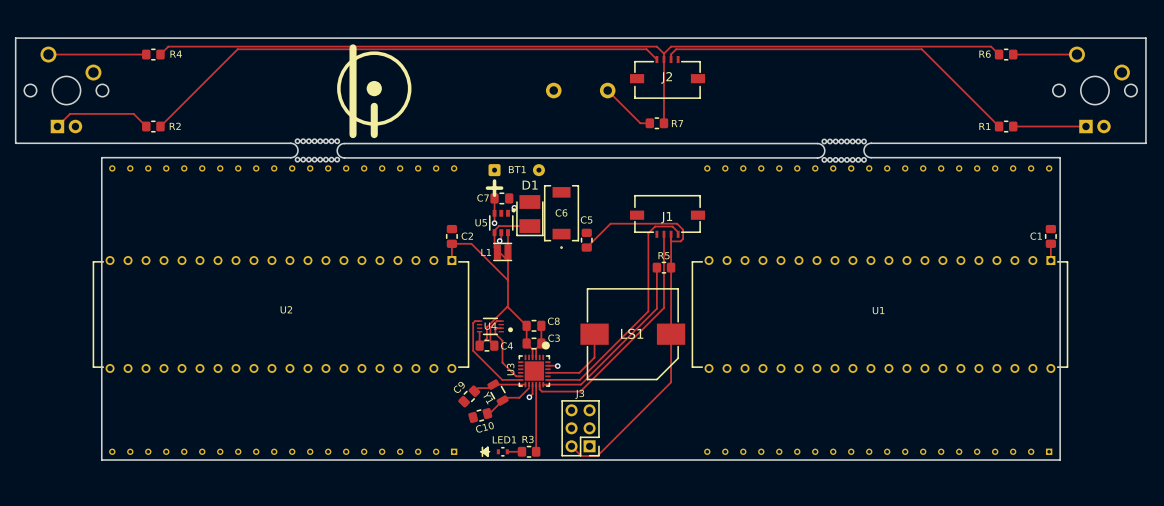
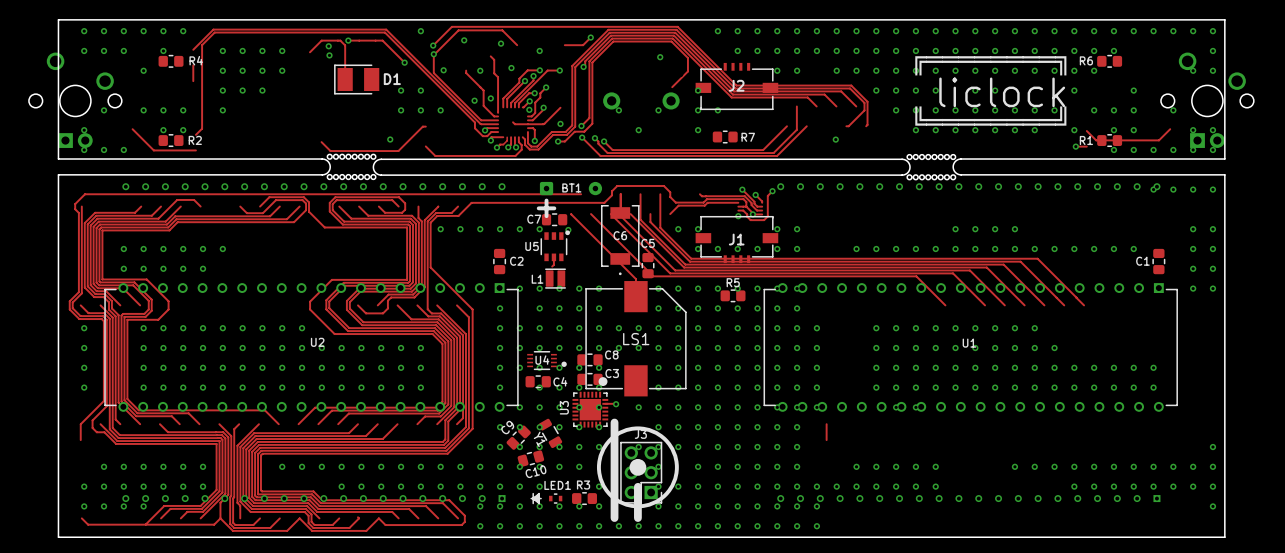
board edge: none -> (1224, 19) (1224, 159)
via: none -> (84, 31)
via: none -> (104, 31)
via: none -> (123, 31)
via: none -> (143, 31)
via: none -> (163, 31)
via: none -> (183, 31)
via: none -> (420, 31)
via: none -> (717, 31)
via: none -> (737, 31)
via: none -> (757, 31)
via: none -> (777, 31)
via: none -> (797, 31)
via: none -> (816, 31)
via: none -> (836, 31)
via: none -> (856, 31)
via: none -> (876, 31)
via: none -> (896, 31)
via: none -> (915, 31)
via: none -> (935, 31)
via: none -> (955, 31)
via: none -> (975, 31)
via: none -> (995, 31)
via: none -> (1014, 31)
via: none -> (1034, 31)
via: none -> (1054, 31)
via: none -> (1074, 31)
via: none -> (1094, 31)
via: none -> (1113, 31)
via: none -> (1133, 31)
via: none -> (1153, 31)
via: none -> (1173, 31)
via: none -> (1193, 31)
via: none -> (1212, 31)
track: none -> (590, 37) (583, 45) (564, 45)
via: none -> (590, 37)
track: none -> (348, 40) (382, 40) (404, 62)
via: none -> (348, 40)
via: none -> (464, 40)
via: none -> (501, 43)
track: none -> (517, 45) (502, 30) (458, 30) (433, 54) (433, 73) (481, 120) (498, 120)
via: none -> (328, 46)
track: none -> (433, 45) (451, 26) (677, 26) (736, 85) (851, 85) (867, 101) (866, 126)
via: none -> (433, 45)
track: none -> (193, 49) (213, 29) (386, 29) (480, 123) (498, 124)
via: none -> (84, 50)
via: none -> (104, 50)
via: none -> (123, 50)
via: none -> (163, 50)
via: none -> (222, 50)
via: none -> (242, 50)
via: none -> (262, 50)
via: none -> (282, 50)
via: none -> (539, 50)
via: none -> (737, 50)
via: none -> (757, 50)
via: none -> (777, 50)
via: none -> (797, 50)
via: none -> (816, 50)
via: none -> (836, 50)
via: none -> (856, 50)
via: none -> (876, 50)
via: none -> (896, 50)
via: none -> (915, 50)
via: none -> (935, 50)
via: none -> (955, 50)
via: none -> (975, 50)
via: none -> (995, 50)
via: none -> (1014, 50)
via: none -> (1034, 50)
via: none -> (1054, 50)
via: none -> (1074, 50)
via: none -> (1094, 50)
via: none -> (1113, 50)
via: none -> (1212, 50)
track: none -> (309, 52) (321, 40) (340, 40) (345, 45) (345, 79)
line: (353, 47) (353, 134) -> none
via: none -> (433, 54)
via: none -> (329, 55)
track: none -> (490, 56) (494, 59) (494, 73) (498, 77) (498, 112)
via: none -> (660, 57)
drawing: [337, 51, 412, 126] -> none
track: (663, 53) (663, 123) -> none
track: (663, 53) (671, 46) (991, 46) (999, 54) -> none
track: (663, 53) (656, 46) (168, 46) (160, 54) -> none
track: (48, 54) (146, 54) -> none
track: (1013, 54) (1076, 54) -> none
via: none -> (404, 62)
track: none -> (193, 65) (193, 81)
text: none -> ╔════════╗ (990, 65)
track: none -> (583, 66) (585, 61) (610, 35) (674, 35) (732, 94) (824, 94) (836, 106)
via: none -> (583, 66)
track: (656, 59) (646, 49) (237, 49) (160, 126) -> none
track: (671, 59) (671, 54) (676, 49) (921, 49) (999, 126) -> none
via: none -> (511, 68)
via: none -> (443, 70)
track: none -> (466, 70) (466, 73) (483, 90) (483, 105) (494, 116) (498, 116)
track: none -> (539, 70) (527, 70) (519, 78) (519, 82) (503, 98) (503, 107)
via: none -> (539, 70)
track: none -> (559, 70) (547, 70) (514, 103) (514, 107)
via: none -> (559, 70)
via: none -> (143, 70)
via: none -> (222, 70)
via: none -> (242, 70)
via: none -> (262, 70)
via: none -> (282, 70)
via: none -> (480, 70)
via: none -> (777, 70)
via: none -> (797, 70)
via: none -> (836, 70)
via: none -> (856, 70)
via: none -> (876, 70)
via: none -> (896, 70)
via: none -> (915, 70)
via: none -> (935, 70)
via: none -> (955, 70)
via: none -> (975, 70)
via: none -> (995, 70)
via: none -> (1014, 70)
via: none -> (1034, 70)
via: none -> (1054, 70)
via: none -> (1074, 70)
via: none -> (1094, 70)
via: none -> (1193, 70)
via: none -> (1212, 70)
track: none -> (533, 76) (533, 80) (511, 102) (511, 107)
via: none -> (533, 76)
track: none -> (525, 81) (507, 98) (507, 107)
via: none -> (525, 81)
track: none -> (546, 87) (535, 102) (535, 113) (531, 116) (527, 116)
via: none -> (546, 87)
track: none -> (672, 87) (687, 71) (687, 57) (671, 41) (613, 41) (592, 62) (592, 123) (584, 131) (574, 131) (564, 141) (558, 141)
via: none -> (222, 90)
via: none -> (242, 90)
via: none -> (262, 90)
via: none -> (401, 90)
via: none -> (420, 90)
via: none -> (698, 90)
via: none -> (876, 90)
via: none -> (896, 90)
via: none -> (915, 90)
via: none -> (935, 90)
via: none -> (975, 90)
via: none -> (995, 90)
via: none -> (1074, 90)
via: none -> (1133, 90)
text: none -> liclock (1002, 92)
track: none -> (534, 93) (529, 93) (518, 103) (518, 107)
via: none -> (534, 93)
via: none -> (490, 98)
via: none -> (474, 100)
track: none -> (529, 101) (522, 107)
via: none -> (529, 101)
track: (607, 90) (640, 123) (649, 123) -> none
track: none -> (796, 106) (796, 129) (773, 153) (607, 153) (594, 138)
track: none -> (816, 106) (807, 97) (731, 97) (672, 38) (612, 38) (589, 61) (589, 118) (581, 126)
track: none -> (856, 106) (841, 91) (733, 91) (675, 32) (609, 32) (575, 67) (575, 126) (566, 134) (553, 134) (538, 149) (529, 149) (525, 144) (525, 139) (522, 137)
track: none -> (543, 107) (532, 120) (527, 120)
via: none -> (543, 107)
track: none -> (560, 107) (543, 124) (514, 124) (513, 122)
via: none -> (529, 109)
via: none -> (104, 110)
via: none -> (143, 110)
via: none -> (163, 110)
via: none -> (183, 110)
via: none -> (222, 110)
via: none -> (401, 110)
via: none -> (420, 110)
via: none -> (440, 110)
via: none -> (618, 110)
via: none -> (658, 110)
via: none -> (698, 110)
via: none -> (717, 110)
via: none -> (896, 110)
via: none -> (915, 110)
via: none -> (935, 110)
via: none -> (955, 110)
via: none -> (975, 110)
via: none -> (995, 110)
via: none -> (1014, 110)
via: none -> (1034, 110)
via: none -> (1054, 110)
via: none -> (1094, 110)
via: none -> (1113, 110)
via: none -> (1133, 110)
via: none -> (1173, 110)
text: none -> ╚════════╝ (990, 116)
line: (374, 106) (374, 134) -> none
via: none -> (560, 123)
track: none -> (425, 126) (422, 126) (398, 151) (330, 151) (321, 142)
via: none -> (581, 126)
track: none -> (786, 126) (763, 150) (612, 150) (604, 141)
track: none -> (806, 126) (777, 155) (600, 155) (582, 137)
track: none -> (846, 126) (864, 110) (864, 102) (850, 88) (735, 88) (676, 29) (608, 29) (572, 65) (572, 125) (565, 131) (551, 131) (537, 146) (531, 146) (527, 143) (527, 132)
track: none -> (498, 128) (487, 128) (485, 130)
track: none -> (527, 128) (534, 129) (534, 140)
track: none -> (132, 129) (153, 150) (195, 150)
track: none -> (1170, 129) (1159, 140) (1096, 140) (1086, 131)
via: none -> (84, 130)
via: none -> (163, 130)
via: none -> (183, 130)
via: none -> (485, 130)
via: none -> (638, 130)
via: none -> (698, 130)
via: none -> (915, 130)
via: none -> (935, 130)
via: none -> (955, 130)
via: none -> (975, 130)
via: none -> (995, 130)
via: none -> (1014, 130)
via: none -> (1034, 130)
via: none -> (1074, 130)
via: none -> (1113, 130)
via: none -> (1133, 130)
via: none -> (1193, 130)
via: none -> (1212, 130)
track: none -> (498, 132) (491, 132) (487, 136) (482, 136) (474, 128) (474, 122) (384, 32) (214, 32) (202, 45) (202, 128) (195, 134)
track: none -> (503, 137) (491, 137) (490, 140)
track: none -> (507, 137) (507, 140) (496, 147)
track: none -> (511, 137) (511, 144) (508, 147)
track: none -> (514, 137) (516, 147)
track: none -> (518, 137) (521, 149) (515, 155) (435, 155) (425, 146)
via: none -> (582, 137)
via: none -> (594, 138)
via: none -> (390, 139)
via: none -> (835, 139)
track: (57, 126) (70, 113) (133, 113) (146, 126) -> none
via: none -> (490, 140)
via: none -> (534, 140)
track: (1013, 126) (1085, 126) -> none
via: none -> (558, 141)
via: none -> (604, 141)
via: none -> (496, 147)
via: none -> (508, 147)
via: none -> (516, 147)
track: none -> (1075, 146) (1086, 146)
via: none -> (1075, 146)
via: none -> (84, 149)
via: none -> (104, 149)
via: none -> (123, 149)
via: none -> (1113, 149)
via: none -> (1133, 149)
via: none -> (1153, 149)
via: none -> (1173, 149)
via: none -> (1193, 149)
via: none -> (1212, 149)
board edge: (51, 143) (15, 143) (15, 38) (1145, 38) (1145, 143) (1110, 143) -> (58, 159) (58, 19) (1224, 19)
board edge: (290, 157) (101, 157) (101, 460) (1060, 460) (1060, 157) -> (322, 174) (58, 174) (58, 537) (1224, 537) (1224, 174) (1169, 174)
track: none -> (742, 189) (757, 206) (762, 206)
via: none -> (742, 189)
via: none -> (1153, 189)
via: none -> (1173, 189)
via: none -> (1193, 189)
via: none -> (1212, 189)
track: none -> (772, 191) (767, 195) (767, 216) (764, 220) (750, 220) (743, 210) (738, 210)
via: none -> (772, 191)
track: none -> (620, 193) (620, 215) (675, 270) (969, 270) (1004, 305)
track: none -> (581, 194) (85, 194) (75, 204) (75, 209) (78, 212) (78, 292) (69, 301) (69, 309) (79, 319) (101, 319) (103, 321) (103, 401) (80, 424) (80, 440)
track: none -> (640, 194) (640, 219) (685, 264) (1003, 264) (1044, 305)
track: none -> (660, 194) (660, 227) (691, 258) (1037, 258) (1084, 305)
track: none -> (699, 194) (705, 196)
track: none -> (755, 194) (762, 202)
via: none -> (755, 194)
track: none -> (705, 196) (744, 196) (757, 210) (762, 210)
track: none -> (738, 202) (678, 205) (670, 214)
track: none -> (81, 206) (81, 293) (72, 302) (72, 308) (80, 316) (102, 316) (106, 319) (106, 406) (92, 420) (92, 427) (96, 432) (104, 432) (116, 443) (216, 443) (216, 489) (200, 505) (164, 505) (145, 524)
track: none -> (141, 206) (134, 212) (95, 212) (84, 223) (84, 287) (94, 297) (103, 297) (108, 302) (108, 309) (115, 316) (115, 419) (120, 424)
track: none -> (161, 206) (151, 215) (96, 215) (87, 224) (87, 286) (95, 294) (104, 294) (111, 301) (111, 308) (118, 315) (118, 402) (140, 424)
track: none -> (180, 206) (165, 221) (98, 221) (93, 226) (93, 283) (97, 288) (123, 288) (140, 305)
track: none -> (200, 206) (194, 199) (177, 199) (158, 218) (97, 218) (90, 225) (90, 285) (96, 291) (106, 291) (120, 305)
track: none -> (240, 206) (246, 213) (262, 213) (275, 200) (302, 200) (306, 203) (306, 210) (294, 222) (177, 222) (169, 230) (102, 230) (102, 279) (146, 279) (168, 301) (168, 309) (158, 319) (127, 319) (127, 398) (138, 410) (264, 410) (278, 424)
track: none -> (260, 206) (269, 197) (303, 197) (309, 202) (309, 211) (324, 227) (407, 227) (407, 279) (331, 279) (310, 301) (310, 309) (334, 334) (432, 334) (442, 343) (442, 401) (436, 407) (315, 407) (298, 424)
track: none -> (279, 206) (270, 216) (175, 216) (166, 224) (99, 224) (96, 228) (96, 282) (99, 285) (133, 285) (148, 300) (148, 309) (144, 313) (123, 313) (121, 315) (121, 401) (136, 416) (171, 416) (179, 424)
track: none -> (299, 206) (286, 219) (176, 219) (168, 227) (101, 227) (99, 229) (99, 281) (134, 282) (151, 299) (151, 310) (145, 316) (124, 316) (124, 400) (137, 413) (188, 413) (199, 424)
track: none -> (339, 206) (351, 218) (410, 218) (415, 223) (415, 283) (410, 288) (359, 288) (346, 300) (346, 309) (362, 325) (436, 325) (451, 340) (451, 405) (440, 416) (425, 416) (417, 424)
track: none -> (359, 206) (368, 215) (411, 215) (418, 222) (418, 284) (411, 291) (360, 291) (349, 302) (349, 308) (363, 322) (437, 322) (454, 339) (454, 407) (437, 424)
track: none -> (378, 206) (385, 212) (402, 212) (405, 209) (405, 203) (398, 197) (335, 197) (329, 202) (329, 211) (342, 224) (408, 224) (410, 226) (410, 281) (408, 282) (343, 282) (326, 300) (326, 309) (348, 331) (433, 331) (445, 342) (445, 403) (437, 410) (331, 410) (318, 424)
track: none -> (398, 206) (392, 200) (336, 200) (332, 204) (332, 210) (344, 221) (409, 221) (412, 225) (412, 282) (409, 285) (345, 285) (329, 301) (329, 308) (349, 328) (435, 328) (448, 341) (448, 404) (439, 413) (348, 413) (338, 424)
track: none -> (418, 206) (418, 218) (421, 221) (421, 285) (413, 294) (388, 294) (377, 305)
track: none -> (438, 206) (424, 220) (424, 287) (414, 297) (391, 297) (387, 300) (387, 308) (383, 313) (365, 313) (357, 305)
track: none -> (458, 206) (451, 212) (436, 212) (427, 221) (427, 309) (431, 313) (441, 313) (463, 335) (463, 418) (456, 424)
track: none -> (738, 206) (746, 206)
track: none -> (746, 206) (746, 201) (743, 199) (707, 199) (703, 202) (675, 202) (663, 185) (617, 185) (604, 202) (471, 202) (458, 215) (437, 215) (430, 222) (430, 267) (472, 309) (472, 428) (447, 453) (262, 453) (260, 455) (260, 490) (313, 491) (322, 500) (449, 500) (464, 515) (464, 521) (461, 525) (385, 525) (378, 518) (366, 530) (312, 530) (299, 518) (287, 530) (232, 530) (220, 518)
track: none -> (746, 206) (752, 214) (762, 214)
track: none -> (571, 214) (635, 279) (635, 296)
track: none -> (591, 214) (653, 276) (916, 276) (945, 305)
track: none -> (610, 214) (670, 273) (953, 273) (985, 305)
track: none -> (630, 214) (684, 267) (986, 267) (1024, 305)
track: none -> (650, 214) (650, 222) (690, 261) (1020, 261) (1056, 297)
via: none -> (752, 214)
via: none -> (738, 216)
track: (494, 198) (494, 223) -> none
via: none -> (440, 229)
via: none -> (460, 229)
via: none -> (480, 229)
via: none -> (500, 229)
via: none -> (519, 229)
via: none -> (539, 229)
via: none -> (678, 229)
via: none -> (698, 229)
via: none -> (777, 229)
via: none -> (797, 229)
via: none -> (955, 229)
via: none -> (975, 229)
via: none -> (995, 229)
via: none -> (1014, 229)
via: none -> (1193, 229)
via: none -> (1212, 229)
D1 rotation: 0° (529, 215) -> 90° clockwise (356, 79)
D1 position: (529, 215) -> (356, 79)
via: (494, 223) -> none
via: none -> (123, 248)
via: none -> (143, 248)
via: none -> (163, 248)
via: none -> (183, 248)
via: none -> (203, 248)
via: none -> (222, 248)
via: none -> (698, 248)
via: none -> (717, 248)
via: none -> (737, 248)
via: none -> (757, 248)
via: none -> (777, 248)
via: none -> (797, 248)
via: none -> (856, 248)
via: none -> (876, 248)
via: none -> (896, 248)
via: none -> (915, 248)
via: none -> (935, 248)
via: none -> (955, 248)
via: none -> (975, 248)
via: none -> (995, 248)
via: none -> (1014, 248)
via: none -> (1034, 248)
via: none -> (1054, 248)
via: none -> (1074, 248)
via: none -> (1094, 248)
via: none -> (1113, 248)
via: none -> (1133, 248)
via: none -> (1193, 248)
via: none -> (1212, 248)
track: (529, 226) (498, 226) (494, 230) (494, 247) (505, 258) -> none
track: (508, 232) (508, 307) -> none
track: (663, 234) (663, 307) (580, 391) (542, 391) (539, 384) -> none
track: (671, 234) (671, 382) (597, 456) (581, 456) (571, 446) -> none
track: (678, 234) (672, 226) (655, 226) (648, 233) (648, 311) (579, 379) (547, 379) -> none
via: (499, 241) -> none
track: (671, 241) (680, 241) (683, 238) (683, 229) (677, 223) (610, 223) (586, 247) -> none
via: none -> (123, 268)
via: none -> (143, 268)
via: none -> (163, 268)
via: none -> (183, 268)
via: none -> (203, 268)
track: (1050, 243) (1050, 260) -> none
via: none -> (1193, 268)
via: none -> (1212, 268)
track: (451, 260) (451, 243) (471, 243) (508, 280) -> none
via: none -> (519, 288)
via: none -> (539, 288)
via: none -> (559, 288)
via: none -> (579, 288)
via: none -> (599, 288)
via: none -> (658, 288)
via: none -> (678, 288)
via: none -> (698, 288)
via: none -> (717, 288)
via: none -> (737, 288)
via: none -> (757, 288)
via: none -> (777, 288)
via: none -> (797, 288)
via: none -> (1193, 288)
via: none -> (1212, 288)
track: (656, 267) (656, 308) (581, 384) (543, 384) -> none
track: none -> (1056, 297) (1064, 305)
track: none -> (80, 305) (88, 313) (104, 313) (109, 318) (109, 429) (118, 438) (218, 438)
track: none -> (100, 305) (112, 317) (112, 428) (119, 435) (217, 435)
track: none -> (397, 305) (411, 319) (438, 319) (457, 337) (457, 408) (445, 420) (445, 439) (442, 441) (257, 441) (249, 450) (249, 498) (254, 503) (308, 503) (317, 512) (392, 512) (398, 518)
track: none -> (417, 305) (428, 316) (439, 316) (460, 336) (460, 409) (448, 421) (448, 440) (444, 444) (259, 444) (252, 451) (252, 496) (255, 500) (309, 500) (318, 509) (409, 509) (418, 518)
track: none -> (437, 305) (465, 334) (465, 427) (445, 447) (260, 447) (255, 453) (255, 495) (256, 497) (310, 497) (319, 506) (426, 506) (438, 518)
track: none -> (456, 305) (468, 317) (468, 428) (446, 450) (261, 450) (258, 454) (258, 494) (312, 494) (320, 503) (442, 503) (458, 518)
via: none -> (500, 308)
via: none -> (539, 308)
via: none -> (559, 308)
via: none -> (579, 308)
via: none -> (599, 308)
via: none -> (658, 308)
via: none -> (678, 308)
via: none -> (698, 308)
via: none -> (717, 308)
via: none -> (737, 308)
via: none -> (757, 308)
via: none -> (777, 308)
via: none -> (797, 308)
via: none -> (84, 328)
via: none -> (143, 328)
via: none -> (163, 328)
via: none -> (183, 328)
via: none -> (203, 328)
via: none -> (222, 328)
via: none -> (242, 328)
via: none -> (262, 328)
via: none -> (282, 328)
via: none -> (302, 328)
via: none -> (500, 328)
via: none -> (519, 328)
via: none -> (539, 328)
via: none -> (559, 328)
via: none -> (579, 328)
via: none -> (599, 328)
via: none -> (618, 328)
via: none -> (638, 328)
via: none -> (658, 328)
via: none -> (678, 328)
via: none -> (698, 328)
via: none -> (717, 328)
via: none -> (737, 328)
via: none -> (757, 328)
via: none -> (777, 328)
via: none -> (797, 328)
via: none -> (816, 328)
via: none -> (876, 328)
via: none -> (896, 328)
via: none -> (915, 328)
via: none -> (935, 328)
via: none -> (955, 328)
via: none -> (975, 328)
via: none -> (995, 328)
via: none -> (1014, 328)
via: none -> (1034, 328)
via: none -> (84, 348)
via: none -> (143, 348)
via: none -> (163, 348)
via: none -> (183, 348)
via: none -> (203, 348)
via: none -> (222, 348)
via: none -> (242, 348)
via: none -> (262, 348)
via: none -> (282, 348)
via: none -> (302, 348)
via: none -> (321, 348)
via: none -> (341, 348)
via: none -> (361, 348)
via: none -> (381, 348)
via: none -> (401, 348)
via: none -> (420, 348)
via: none -> (500, 348)
via: none -> (519, 348)
via: none -> (539, 348)
via: none -> (559, 348)
via: none -> (579, 348)
via: none -> (599, 348)
via: none -> (618, 348)
via: none -> (638, 348)
via: none -> (658, 348)
via: none -> (678, 348)
via: none -> (698, 348)
via: none -> (717, 348)
via: none -> (737, 348)
via: none -> (757, 348)
via: none -> (777, 348)
via: none -> (797, 348)
via: none -> (816, 348)
via: none -> (876, 348)
via: none -> (896, 348)
via: none -> (915, 348)
via: none -> (935, 348)
via: none -> (955, 348)
via: none -> (975, 348)
via: none -> (995, 348)
via: none -> (1014, 348)
via: none -> (1034, 348)
via: none -> (1054, 348)
track: (479, 321) (473, 323) (473, 350) (502, 379) (520, 379) -> none
track: (501, 321) (496, 321) (490, 327) (490, 341) (494, 345) -> none
track: (541, 325) (541, 343) (536, 348) (536, 357) -> none
track: (501, 328) (496, 328) (495, 333) (502, 340) (502, 362) (516, 376) (520, 376) -> none
track: (479, 331) (479, 345) (486, 338) (486, 327) (508, 307) (526, 325) (526, 343) (532, 349) (532, 357) -> none
via: none -> (84, 367)
via: none -> (143, 367)
via: none -> (163, 367)
via: none -> (183, 367)
via: none -> (203, 367)
via: none -> (222, 367)
via: none -> (242, 367)
via: none -> (262, 367)
via: none -> (282, 367)
via: none -> (302, 367)
via: none -> (321, 367)
via: none -> (341, 367)
via: none -> (361, 367)
via: none -> (381, 367)
via: none -> (401, 367)
via: none -> (420, 367)
via: none -> (500, 367)
via: none -> (519, 367)
via: none -> (539, 367)
via: none -> (559, 367)
via: none -> (579, 367)
via: none -> (599, 367)
via: none -> (658, 367)
via: none -> (678, 367)
via: none -> (698, 367)
via: none -> (717, 367)
via: none -> (737, 367)
via: none -> (757, 367)
via: none -> (777, 367)
via: none -> (797, 367)
via: none -> (816, 367)
via: none -> (876, 367)
via: none -> (896, 367)
via: none -> (915, 367)
via: none -> (935, 367)
via: none -> (955, 367)
via: none -> (975, 367)
via: none -> (995, 367)
via: none -> (1014, 367)
via: none -> (1034, 367)
via: none -> (1054, 367)
via: none -> (1074, 367)
via: none -> (1094, 367)
via: none -> (1113, 367)
via: none -> (1133, 367)
via: none -> (1153, 367)
track: (594, 334) (594, 357) (579, 372) (547, 372) -> none
LS1 rotation: 0° (632, 334) -> 90° counterclockwise (635, 338)
LS1 position: (632, 334) -> (635, 338)
via: none -> (84, 387)
via: none -> (143, 387)
via: none -> (163, 387)
via: none -> (183, 387)
via: none -> (203, 387)
via: none -> (222, 387)
via: none -> (242, 387)
via: none -> (262, 387)
via: none -> (282, 387)
via: none -> (302, 387)
via: none -> (321, 387)
via: none -> (341, 387)
via: none -> (361, 387)
via: none -> (381, 387)
via: none -> (401, 387)
via: none -> (420, 387)
via: none -> (500, 387)
via: none -> (539, 387)
via: none -> (559, 387)
via: none -> (579, 387)
via: none -> (599, 387)
via: none -> (658, 387)
via: none -> (678, 387)
via: none -> (698, 387)
via: none -> (717, 387)
via: none -> (737, 387)
via: none -> (757, 387)
via: none -> (777, 387)
via: none -> (797, 387)
via: none -> (816, 387)
via: none -> (876, 387)
via: none -> (896, 387)
via: none -> (915, 387)
via: none -> (935, 387)
via: none -> (955, 387)
via: none -> (975, 387)
via: none -> (995, 387)
via: none -> (1014, 387)
via: none -> (1034, 387)
via: none -> (1054, 387)
via: none -> (1074, 387)
via: none -> (1094, 387)
via: none -> (1113, 387)
via: none -> (1133, 387)
via: none -> (1153, 387)
via: none -> (519, 407)
via: none -> (539, 407)
via: none -> (559, 407)
via: none -> (579, 407)
via: none -> (599, 407)
via: none -> (638, 407)
via: none -> (658, 407)
via: none -> (678, 407)
via: none -> (698, 407)
via: none -> (717, 407)
via: none -> (737, 407)
via: none -> (757, 407)
via: none -> (777, 407)
via: none -> (797, 407)
via: none -> (816, 407)
via: none -> (896, 407)
via: none -> (915, 407)
line: none -> (614, 422) (614, 518)
track: none -> (100, 424) (117, 441) (219, 441) (219, 491) (201, 508) (170, 508) (161, 518)
track: none -> (159, 424) (167, 432) (223, 432) (228, 437) (228, 494) (220, 502) (220, 518)
track: none -> (219, 424) (231, 436) (230, 523) (234, 527) (270, 527) (279, 518)
track: none -> (239, 424) (234, 429) (233, 522) (235, 525) (253, 525) (260, 518)
track: none -> (258, 424) (237, 445) (237, 502) (240, 505) (240, 518)
track: none -> (357, 424) (349, 433) (254, 433) (240, 446) (240, 501) (250, 512) (304, 512) (308, 515) (308, 523) (313, 527) (349, 527) (359, 518) (357, 517)
track: none -> (377, 424) (365, 436) (255, 436) (243, 448) (243, 500) (251, 509) (305, 509) (311, 514) (311, 521) (314, 525) (332, 525) (339, 518)
track: none -> (397, 424) (382, 439) (256, 439) (246, 449) (246, 499) (253, 506) (307, 506) (319, 518)
track: (493, 384) (525, 384) -> none
track: (532, 384) (532, 394) (529, 397) -> none
track: (536, 384) (536, 451) -> none
track: none -> (826, 424) (826, 440)
via: none -> (500, 427)
via: none -> (519, 427)
via: none -> (539, 427)
via: none -> (559, 427)
via: none -> (579, 427)
drawing: none -> [596, 426, 679, 509]
via: none -> (599, 427)
via: none -> (658, 427)
via: none -> (678, 427)
via: none -> (698, 427)
via: none -> (717, 427)
via: none -> (737, 427)
via: none -> (757, 427)
via: none -> (777, 427)
via: none -> (797, 427)
track: (477, 388) (489, 388) -> none
track: (529, 388) (519, 397) (505, 397) -> none
track: none -> (217, 435) (221, 435) (225, 438) (225, 493) (200, 518)
track: none -> (218, 438) (222, 439) (222, 492) (203, 511) (187, 511) (180, 518)
via: (529, 397) -> none
track: (502, 400) (489, 413) -> none
via: none -> (480, 447)
via: none -> (500, 447)
via: none -> (519, 447)
via: none -> (539, 447)
via: none -> (559, 447)
via: none -> (579, 447)
via: none -> (599, 447)
via: none -> (638, 447)
via: none -> (658, 447)
via: none -> (678, 447)
via: none -> (698, 447)
via: none -> (717, 447)
via: none -> (737, 447)
via: none -> (757, 447)
via: none -> (777, 447)
via: none -> (797, 447)
via: none -> (1212, 447)
via: none -> (104, 466)
via: none -> (123, 466)
via: none -> (143, 466)
via: none -> (163, 466)
via: none -> (183, 466)
via: none -> (203, 466)
via: none -> (282, 466)
via: none -> (302, 466)
via: none -> (321, 466)
via: none -> (341, 466)
via: none -> (361, 466)
via: none -> (381, 466)
via: none -> (401, 466)
via: none -> (420, 466)
via: none -> (440, 466)
via: none -> (460, 466)
via: none -> (480, 466)
via: none -> (500, 466)
via: none -> (519, 466)
via: none -> (539, 466)
via: none -> (559, 466)
via: none -> (579, 466)
via: none -> (658, 466)
via: none -> (698, 466)
via: none -> (717, 466)
via: none -> (737, 466)
via: none -> (757, 466)
via: none -> (777, 466)
via: none -> (797, 466)
via: none -> (856, 466)
via: none -> (876, 466)
via: none -> (896, 466)
via: none -> (915, 466)
via: none -> (935, 466)
via: none -> (1014, 466)
via: none -> (1034, 466)
via: none -> (1054, 466)
via: none -> (1074, 466)
via: none -> (1094, 466)
via: none -> (1113, 466)
via: none -> (1133, 466)
via: none -> (1153, 466)
via: none -> (1173, 466)
via: none -> (1193, 466)
via: none -> (1212, 466)
via: none -> (84, 486)
via: none -> (104, 486)
via: none -> (123, 486)
via: none -> (143, 486)
via: none -> (163, 486)
via: none -> (183, 486)
via: none -> (203, 486)
via: none -> (341, 486)
via: none -> (361, 486)
via: none -> (381, 486)
via: none -> (401, 486)
via: none -> (420, 486)
via: none -> (440, 486)
via: none -> (460, 486)
via: none -> (480, 486)
via: none -> (500, 486)
via: none -> (519, 486)
via: none -> (539, 486)
via: none -> (599, 486)
via: none -> (658, 486)
via: none -> (678, 486)
via: none -> (698, 486)
via: none -> (717, 486)
via: none -> (737, 486)
via: none -> (757, 486)
via: none -> (777, 486)
via: none -> (797, 486)
via: none -> (816, 486)
via: none -> (836, 486)
via: none -> (856, 486)
via: none -> (876, 486)
via: none -> (896, 486)
via: none -> (915, 486)
via: none -> (935, 486)
via: none -> (1074, 486)
via: none -> (1094, 486)
via: none -> (1113, 486)
via: none -> (1133, 486)
via: none -> (1153, 486)
via: none -> (1173, 486)
via: none -> (1193, 486)
via: none -> (1212, 486)
line: none -> (637, 486) (637, 518)
track: (507, 451) (521, 451) -> none
via: none -> (84, 506)
via: none -> (104, 506)
via: none -> (123, 506)
via: none -> (143, 506)
via: none -> (480, 506)
via: none -> (500, 506)
via: none -> (519, 506)
via: none -> (539, 506)
via: none -> (559, 506)
via: none -> (579, 506)
via: none -> (599, 506)
via: none -> (658, 506)
via: none -> (678, 506)
via: none -> (698, 506)
via: none -> (717, 506)
via: none -> (737, 506)
via: none -> (757, 506)
via: none -> (777, 506)
via: none -> (797, 506)
via: none -> (816, 506)
via: none -> (1212, 506)
track: none -> (81, 518) (88, 524) (214, 524) (220, 518)
via: none -> (480, 526)
via: none -> (500, 526)
via: none -> (519, 526)
via: none -> (539, 526)
via: none -> (559, 526)
via: none -> (579, 526)
via: none -> (599, 526)
via: none -> (618, 526)
via: none -> (638, 526)
via: none -> (658, 526)
via: none -> (678, 526)
via: none -> (698, 526)
via: none -> (717, 526)
via: none -> (737, 526)
via: none -> (757, 526)
via: none -> (777, 526)
via: none -> (797, 526)
via: none -> (816, 526)

